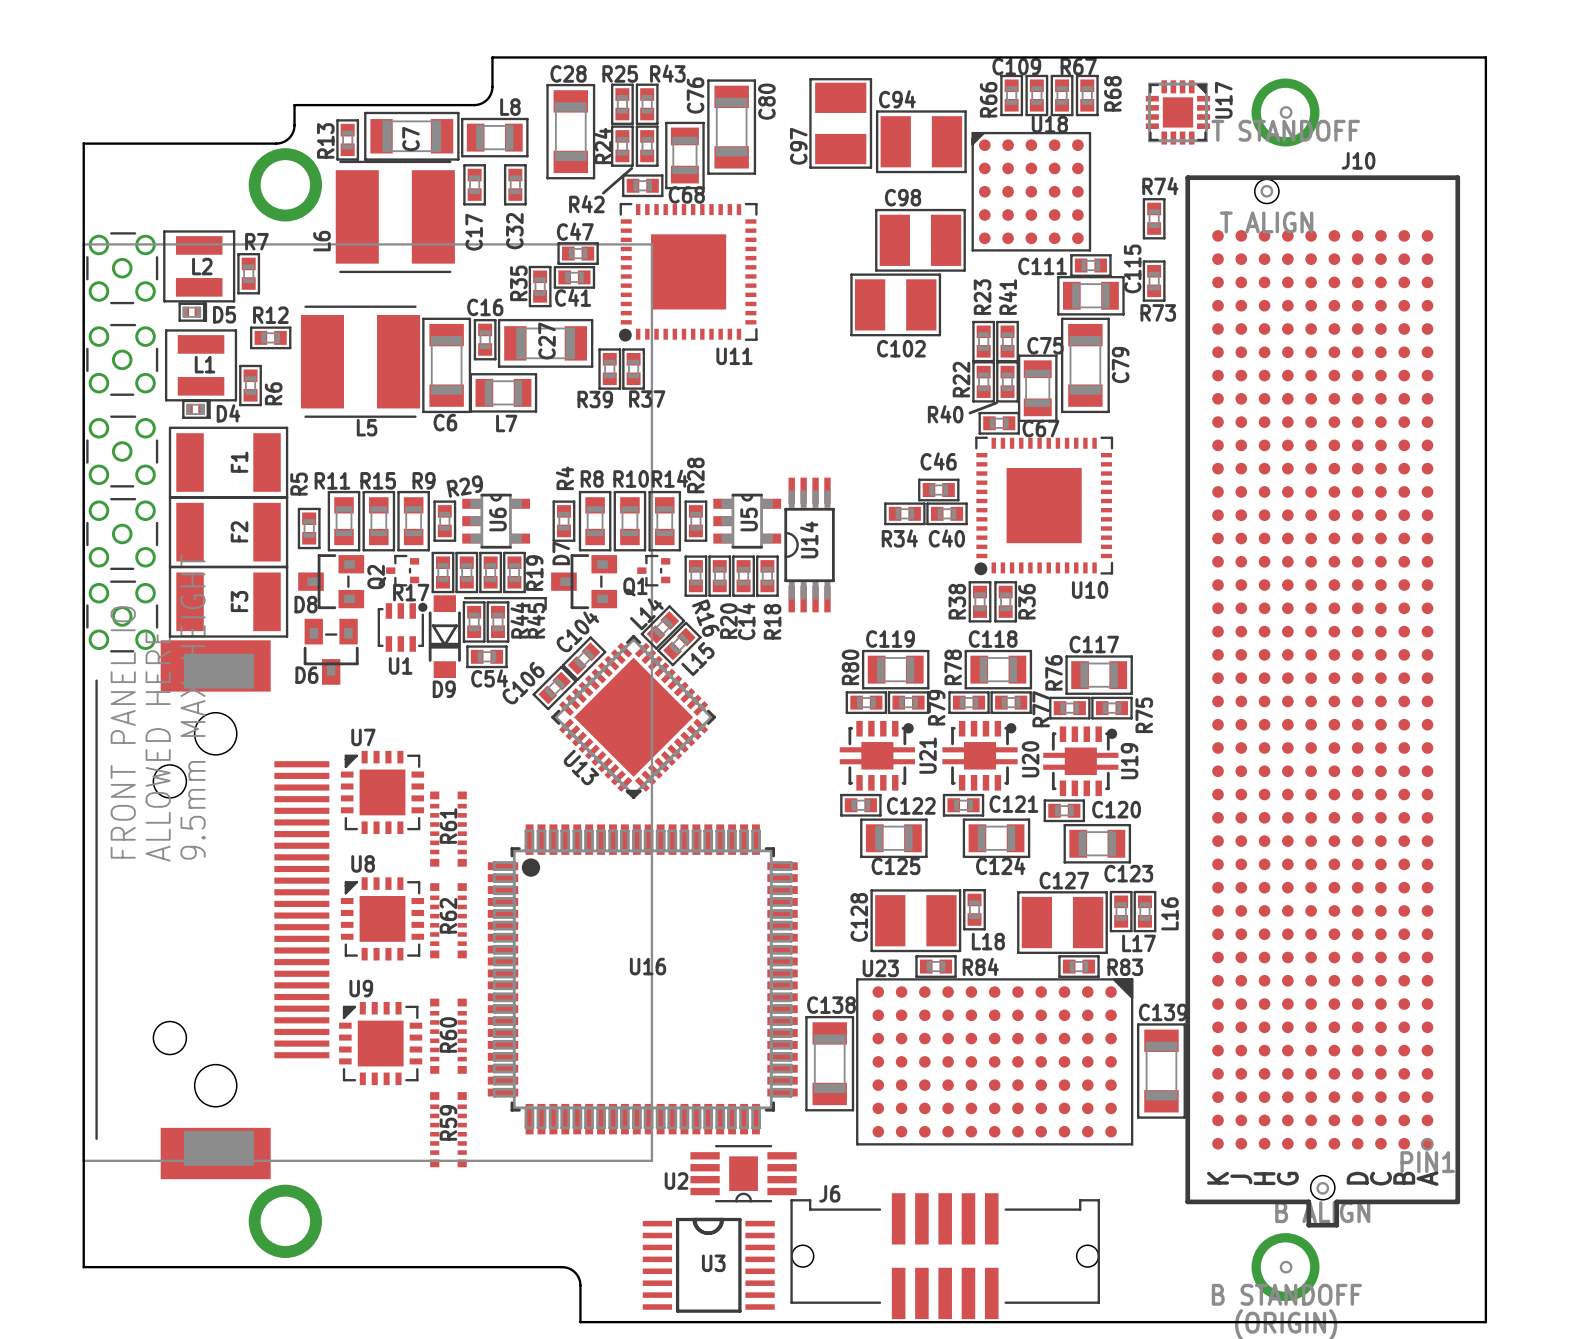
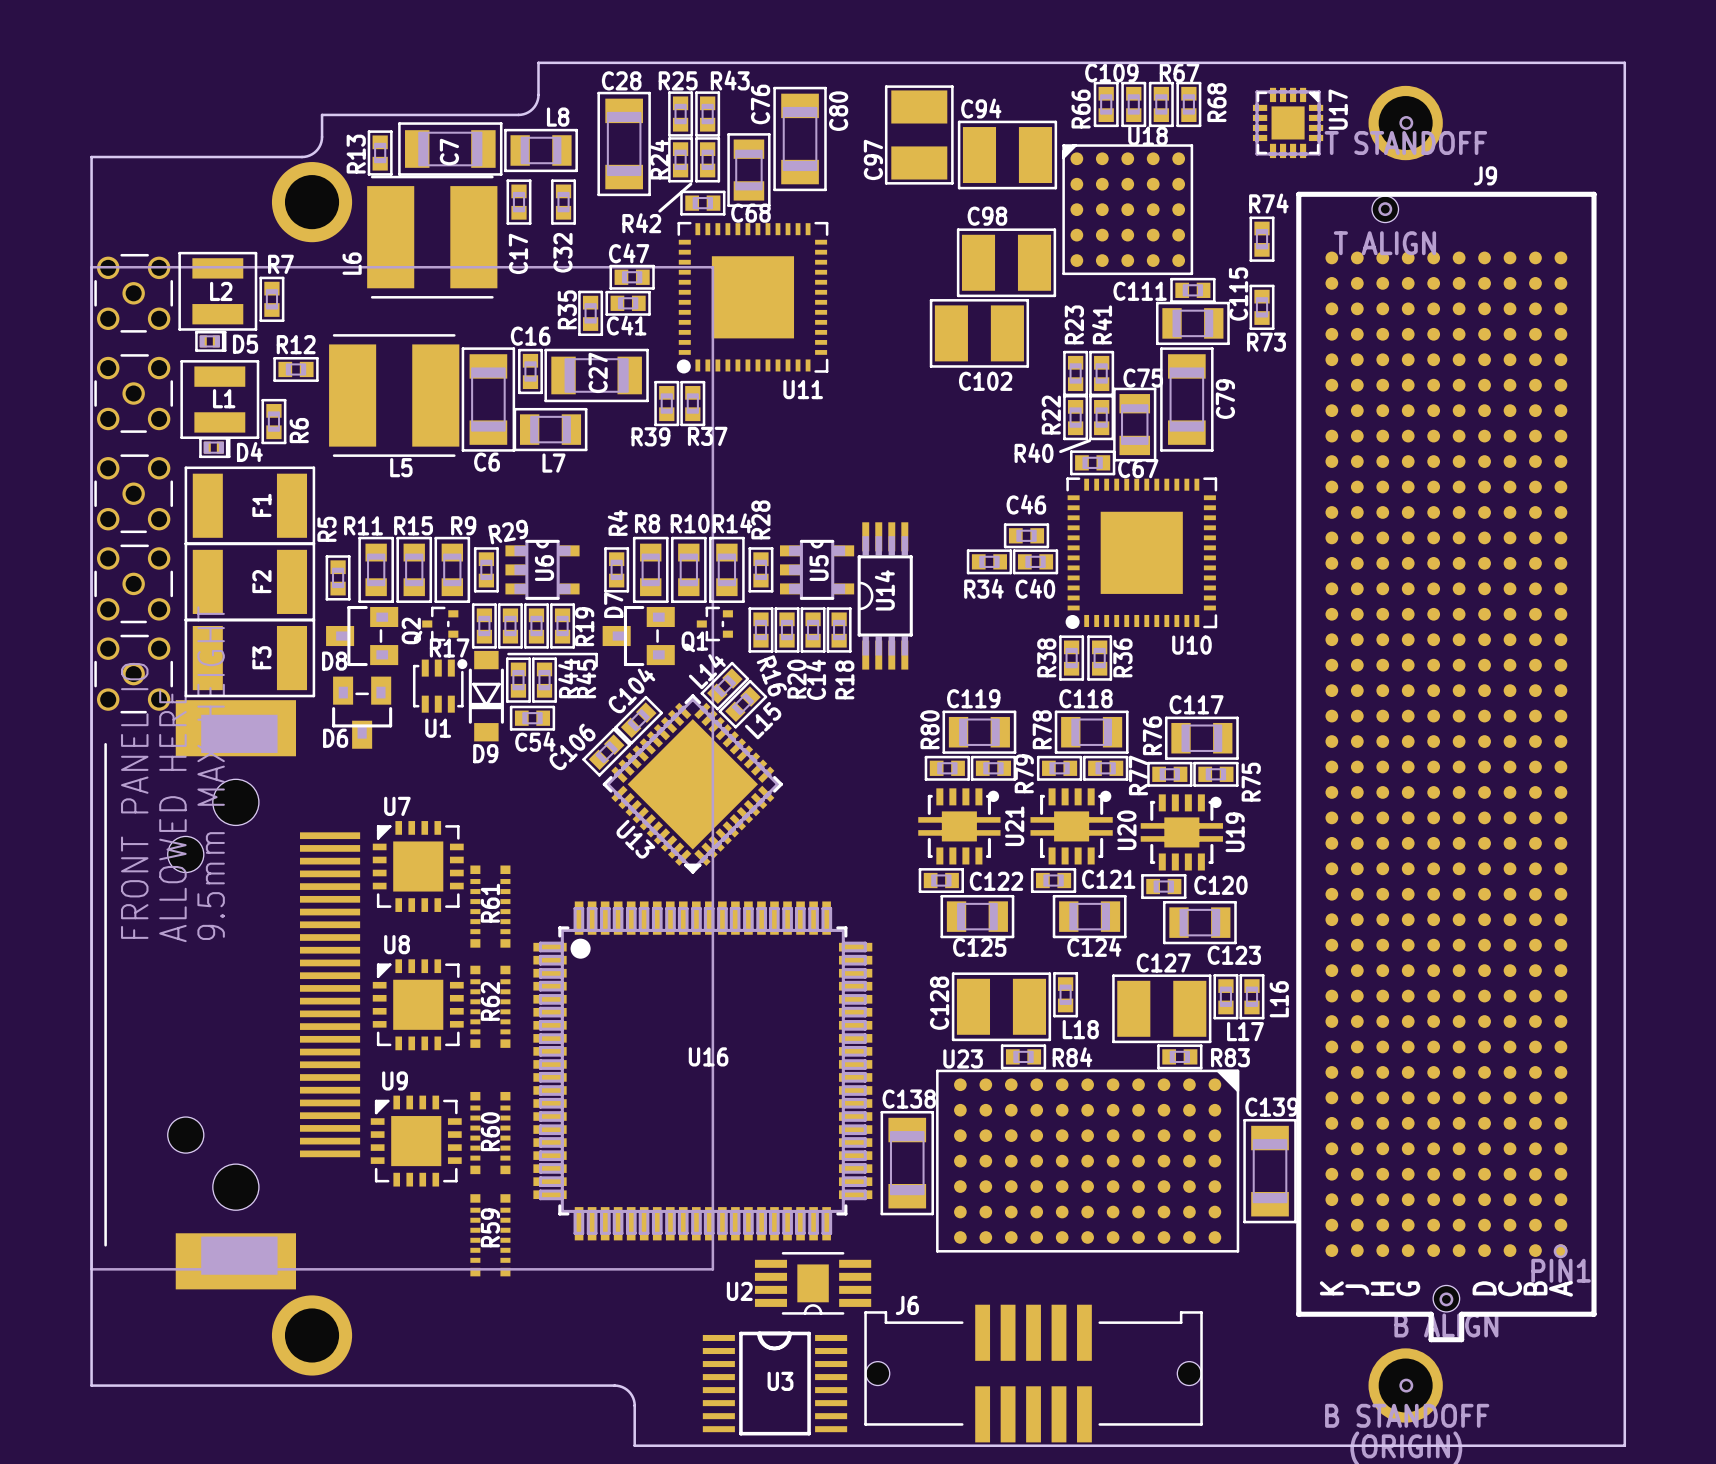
J10 name: J10 (1358, 160) -> J9 (1485, 175)

